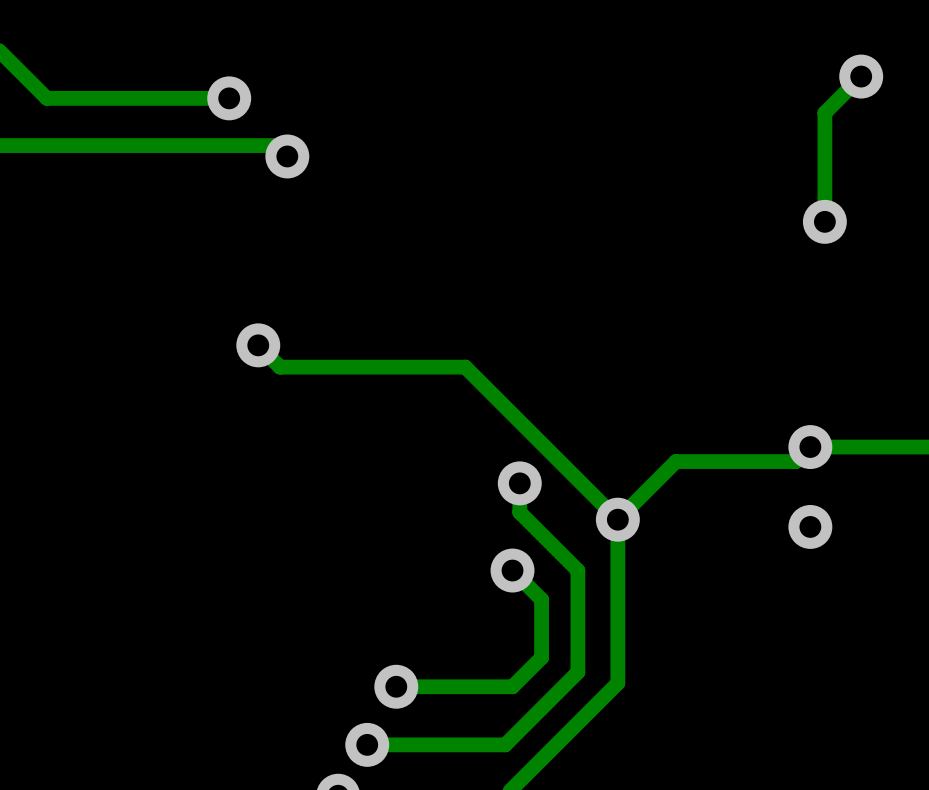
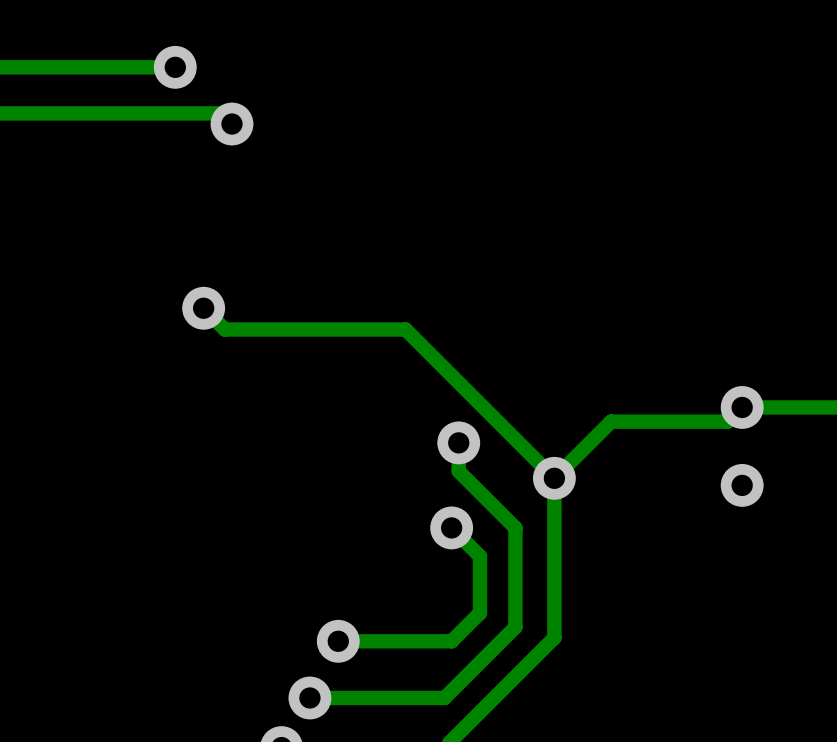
track: (861, 76) (824, 112) (824, 221) -> none
via: (861, 76) -> none
via: (824, 221) -> none

